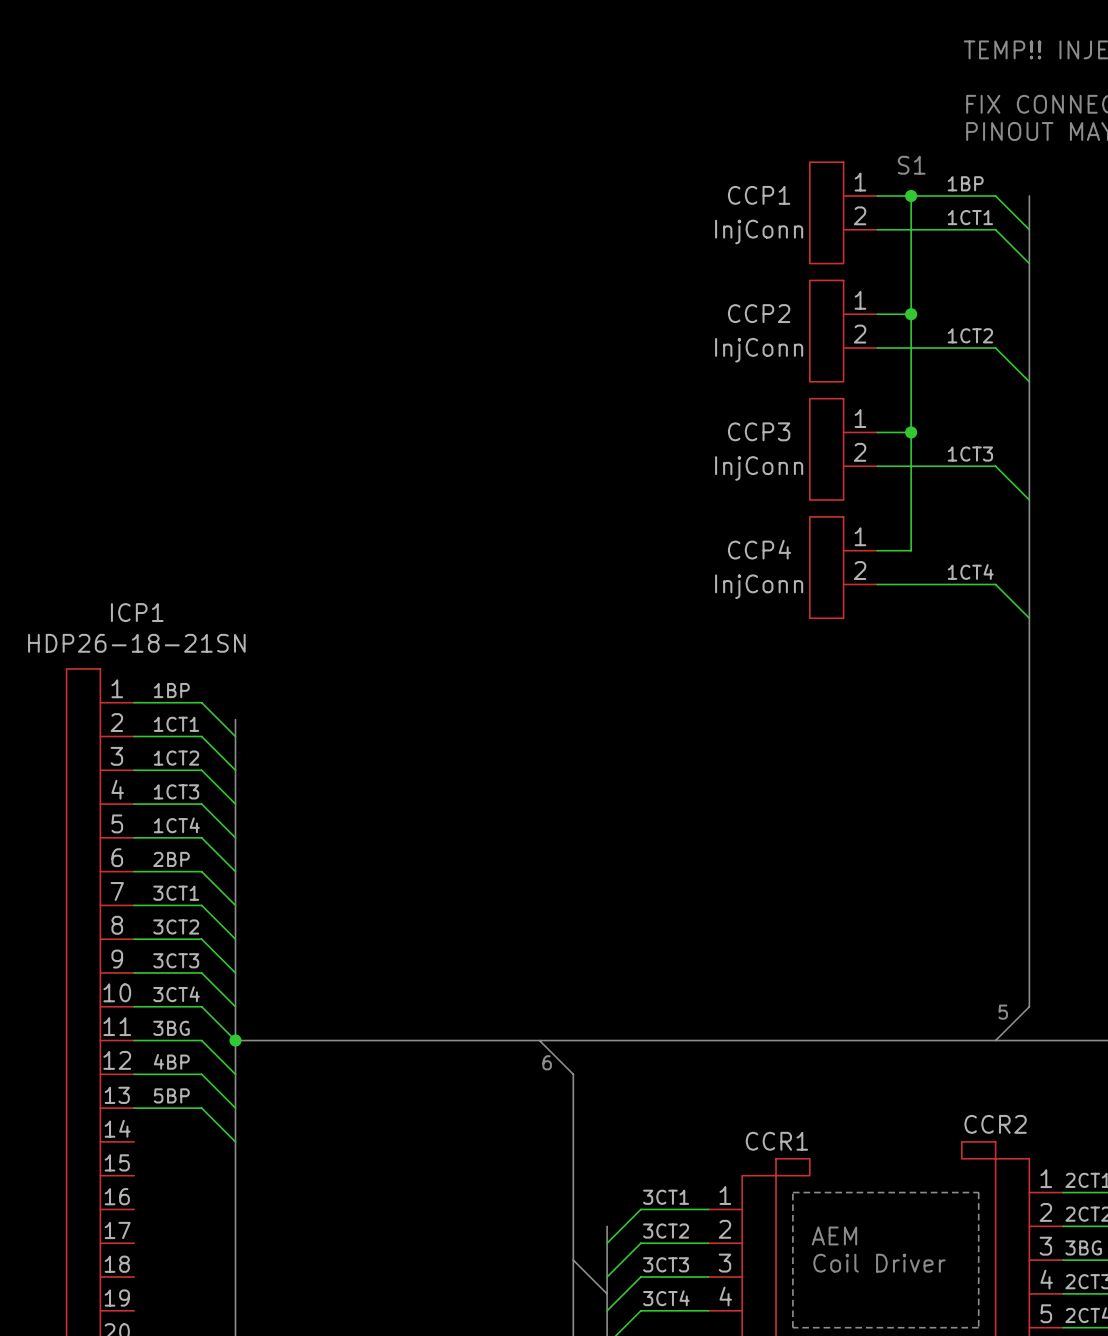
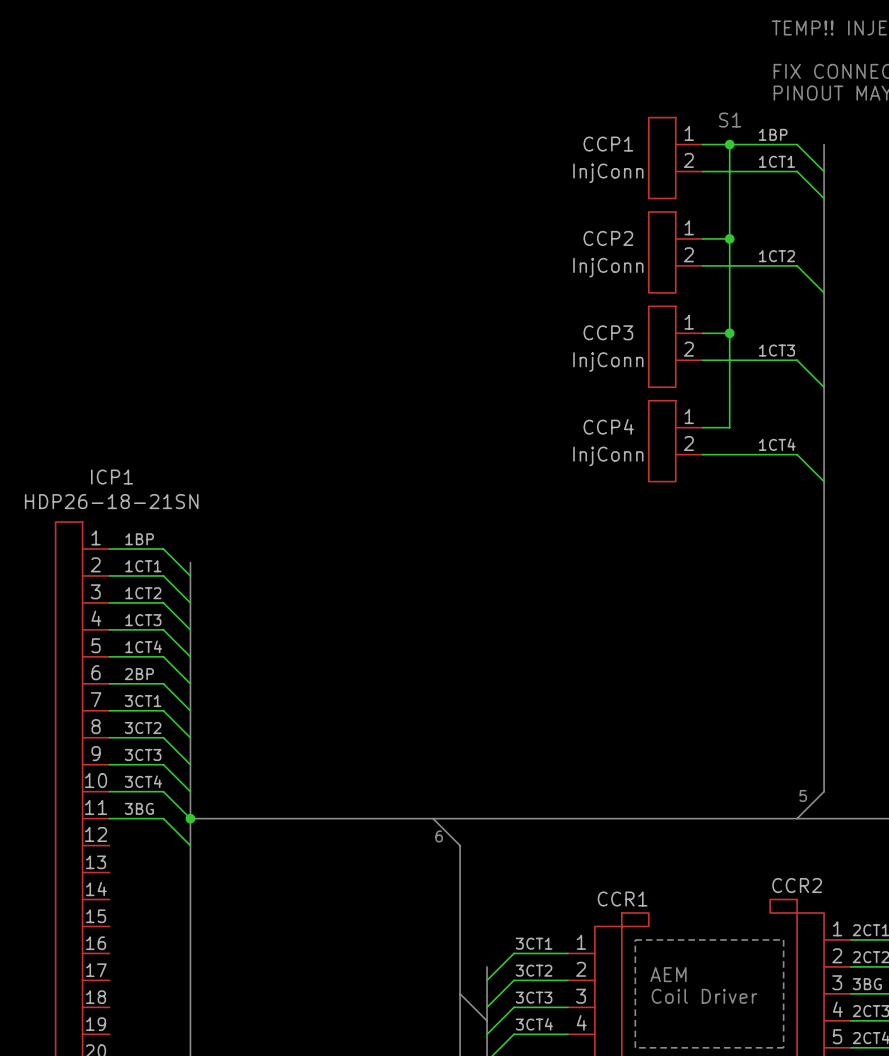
label: 4BP (171, 1061) -> none
wire: (134, 1074) (201, 1074) (235, 1108) -> none
label: 5BP (171, 1095) -> none
wire: (134, 1108) (201, 1108) (235, 1141) -> none

